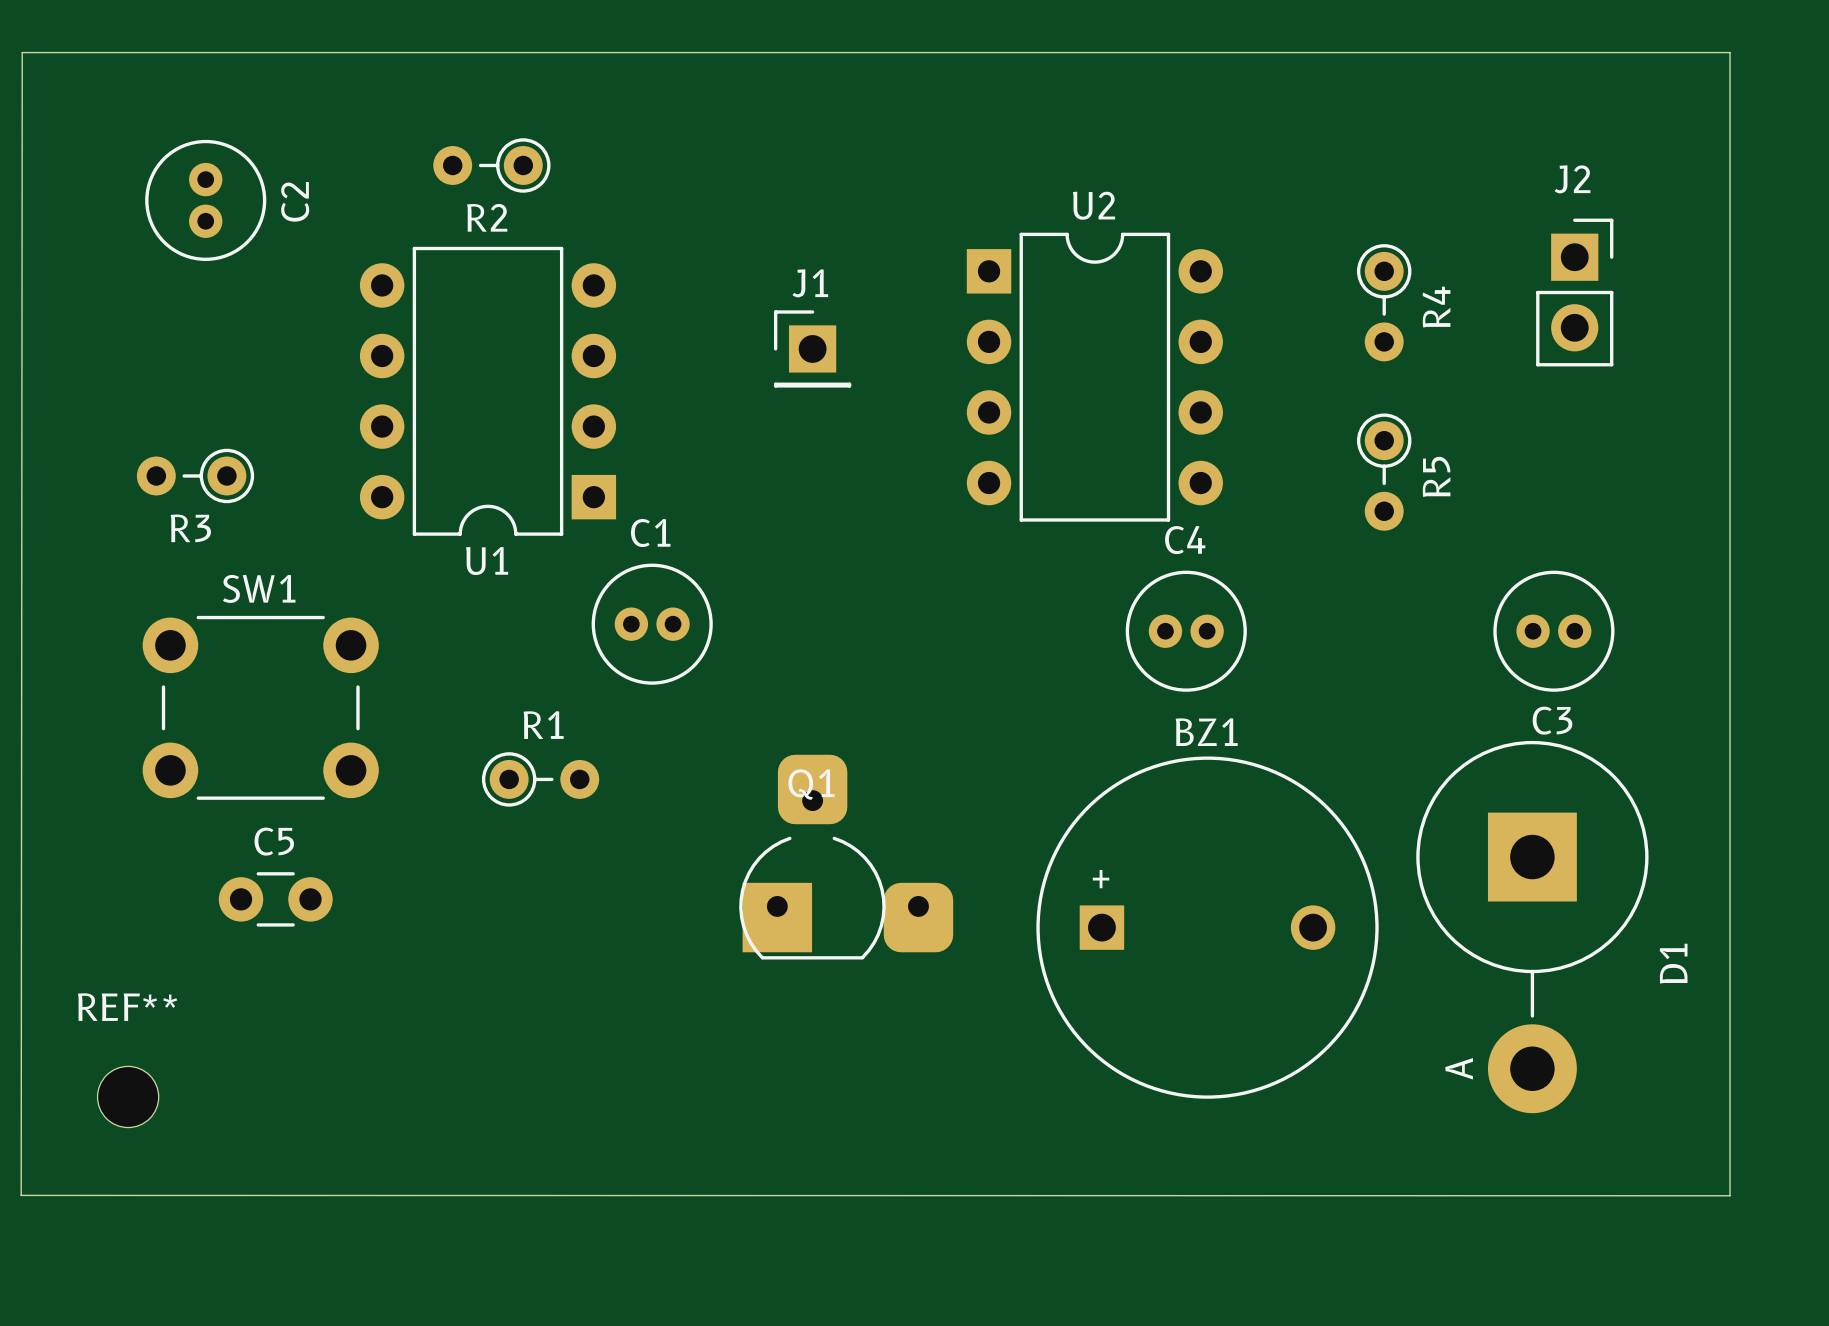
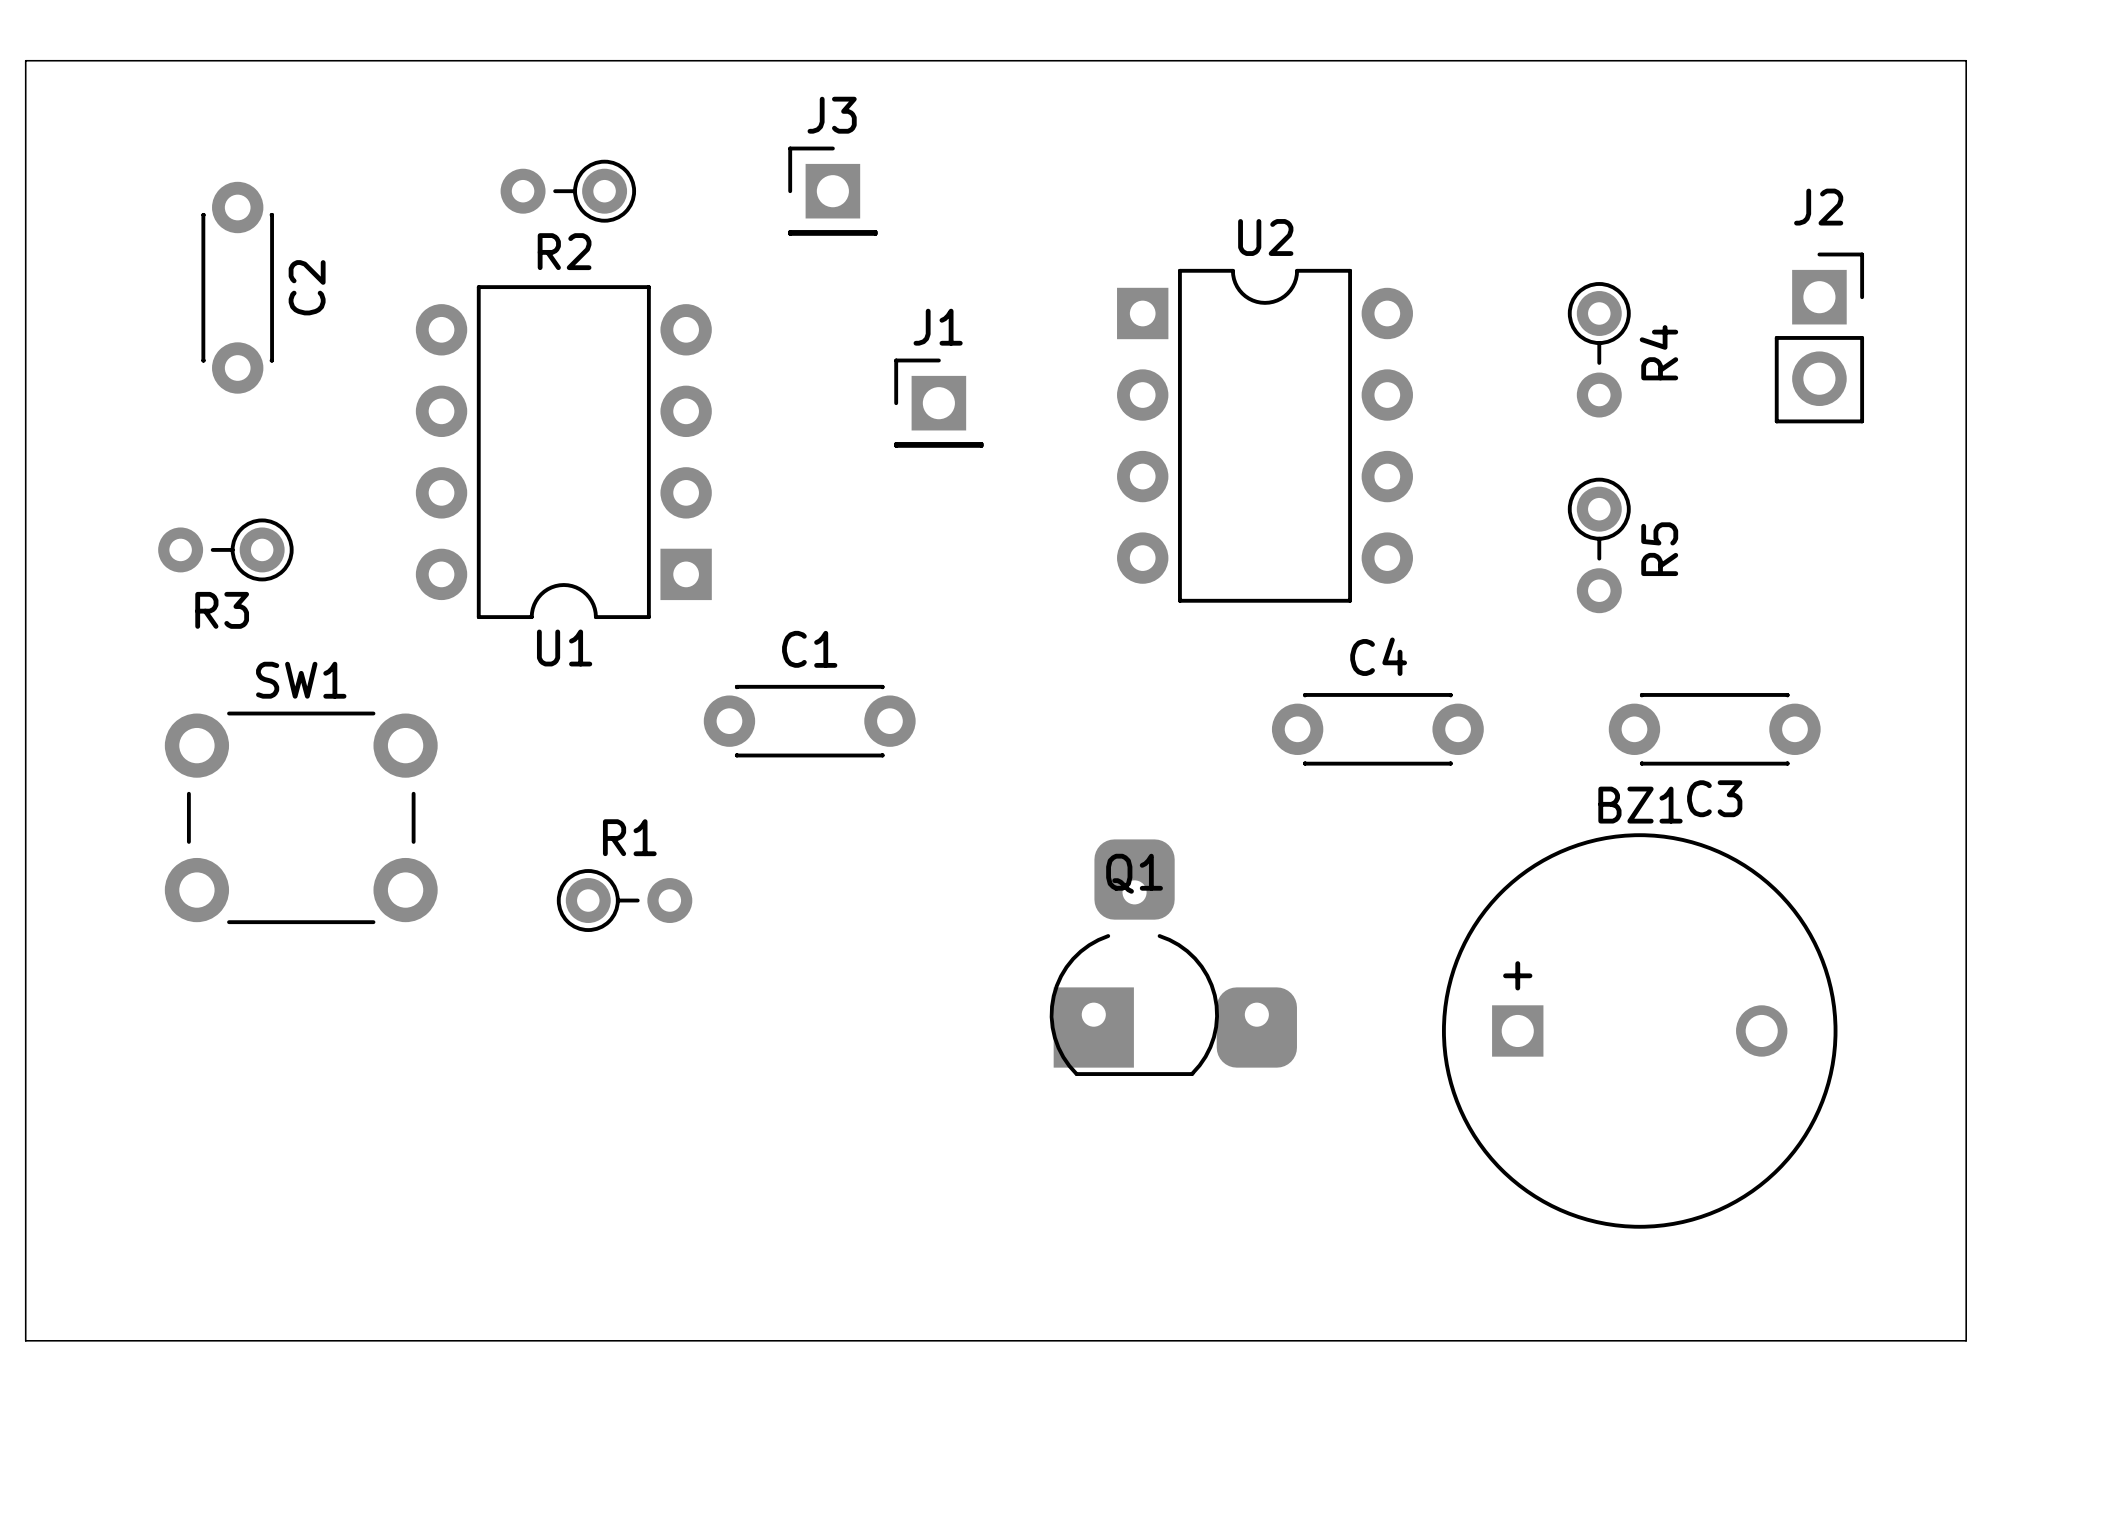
board edge: (22, 52) (21, 1195) (1730, 1195) (1730, 52) (1701, 52) -> (25, 60) (25, 1340) (1966, 1340) (1966, 60)
C2 footprint: [145, 139, 267, 262] -> [201, 181, 274, 394]
J3: none -> (832, 191)
C1 footprint: [591, 563, 713, 685] -> [703, 684, 916, 758]
C4 footprint: [1125, 570, 1247, 692] -> [1271, 693, 1484, 766]
C3 footprint: [1493, 570, 1615, 692] -> [1608, 693, 1821, 766]
Q1 position: (846, 857) -> (1173, 957)
C5: (275, 899) -> none
BZ1 position: (1207, 927) -> (1639, 1030)
D1: (1532, 927) -> none
REF**: (128, 1096) -> none

